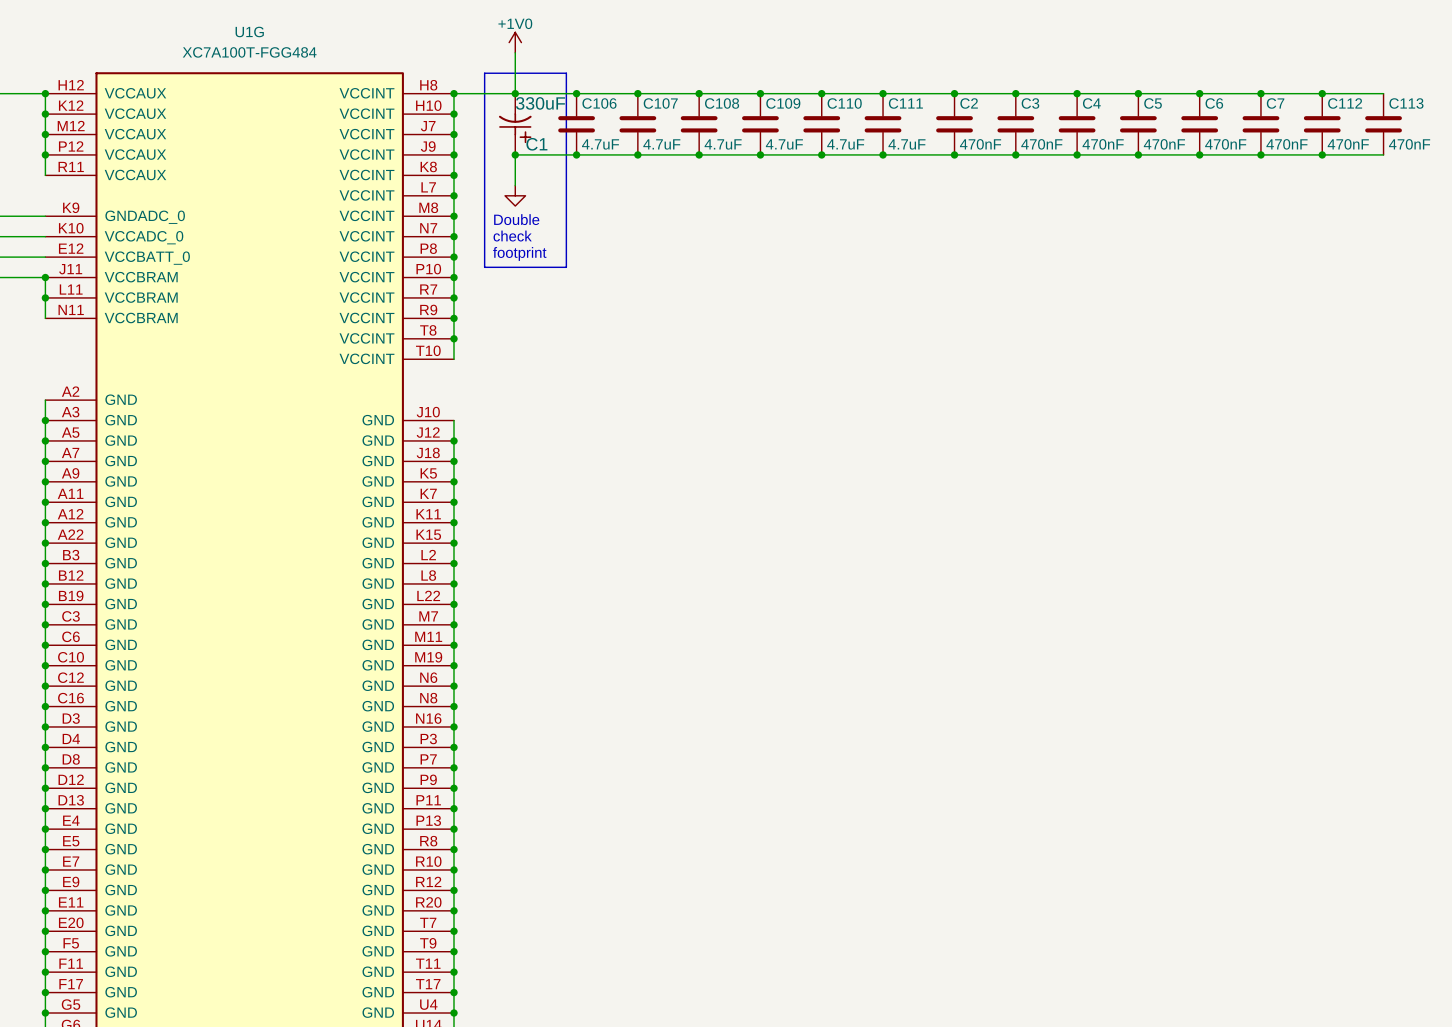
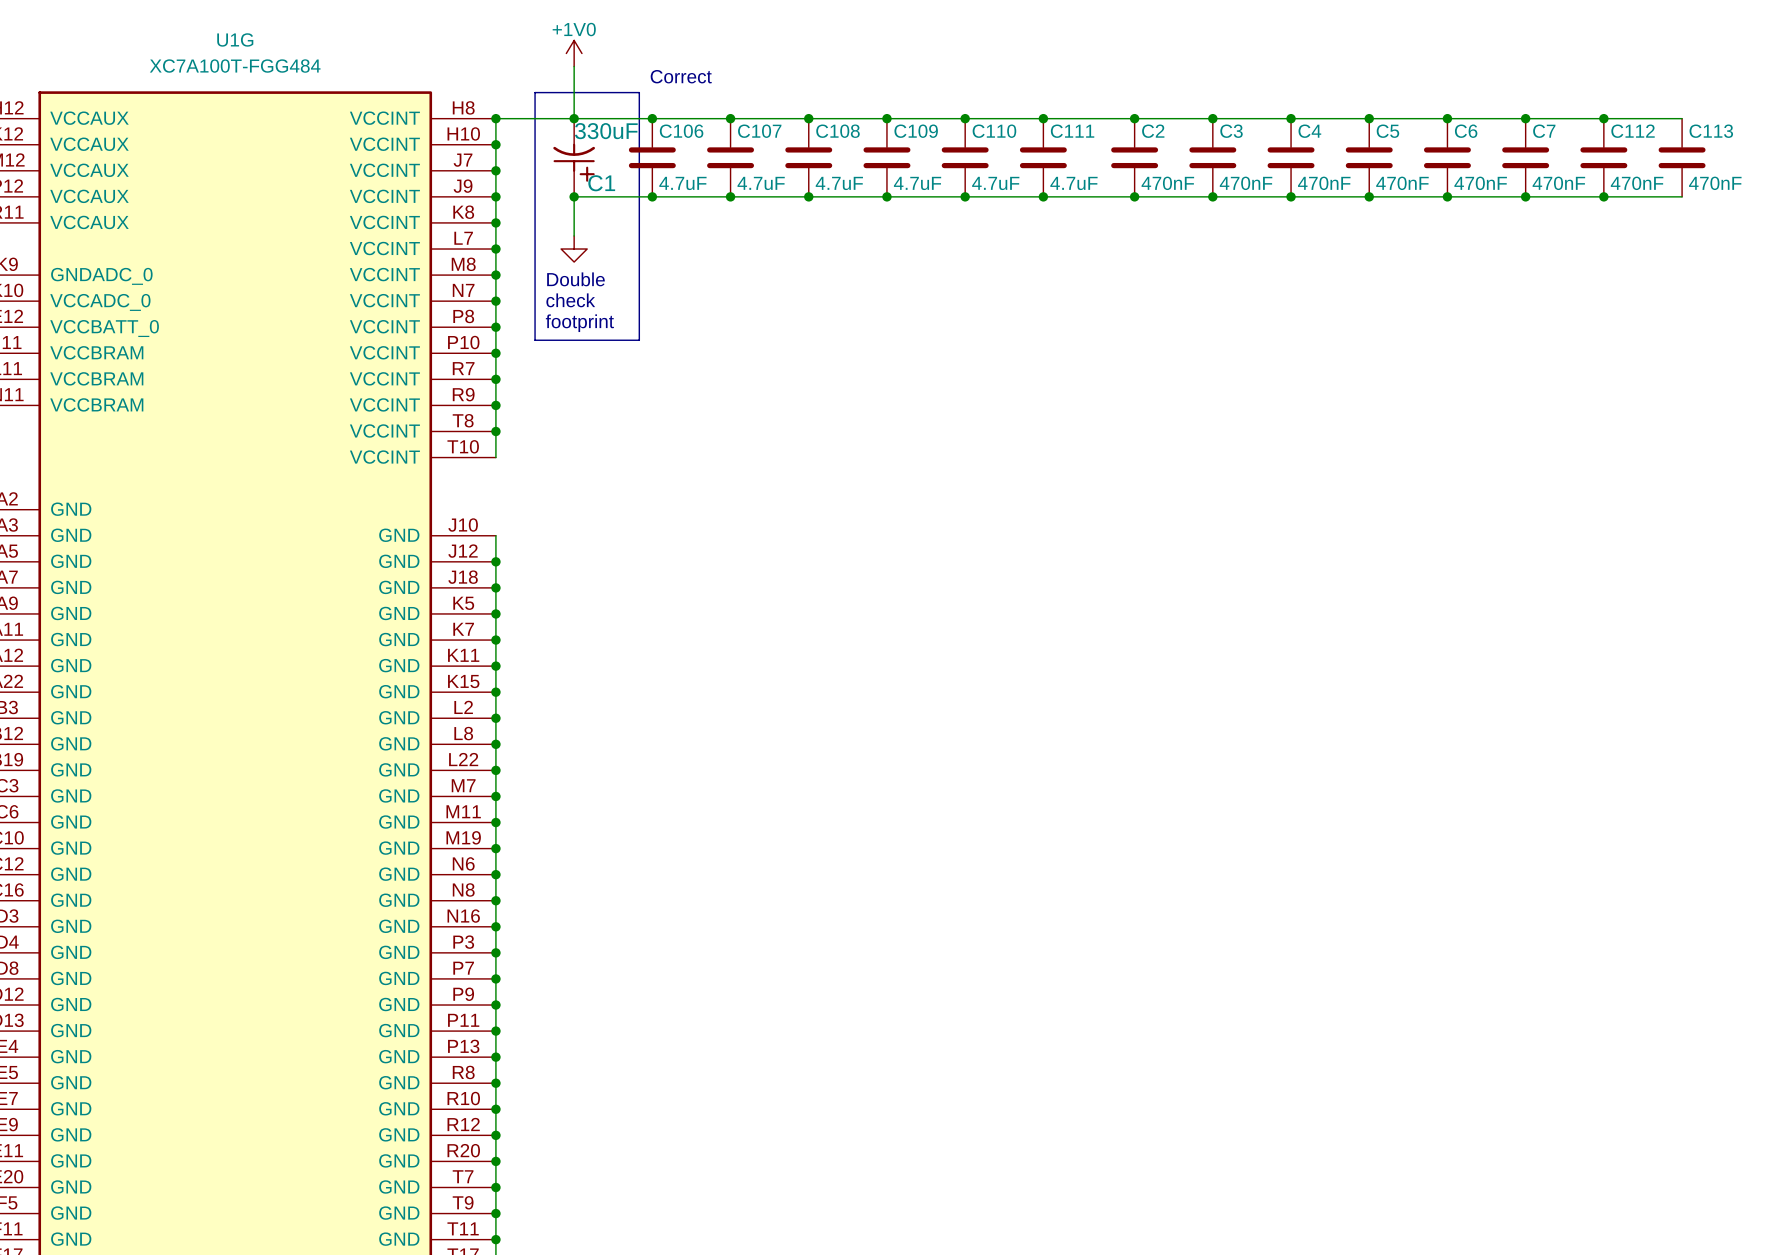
text: none -> Correct (681, 76)

